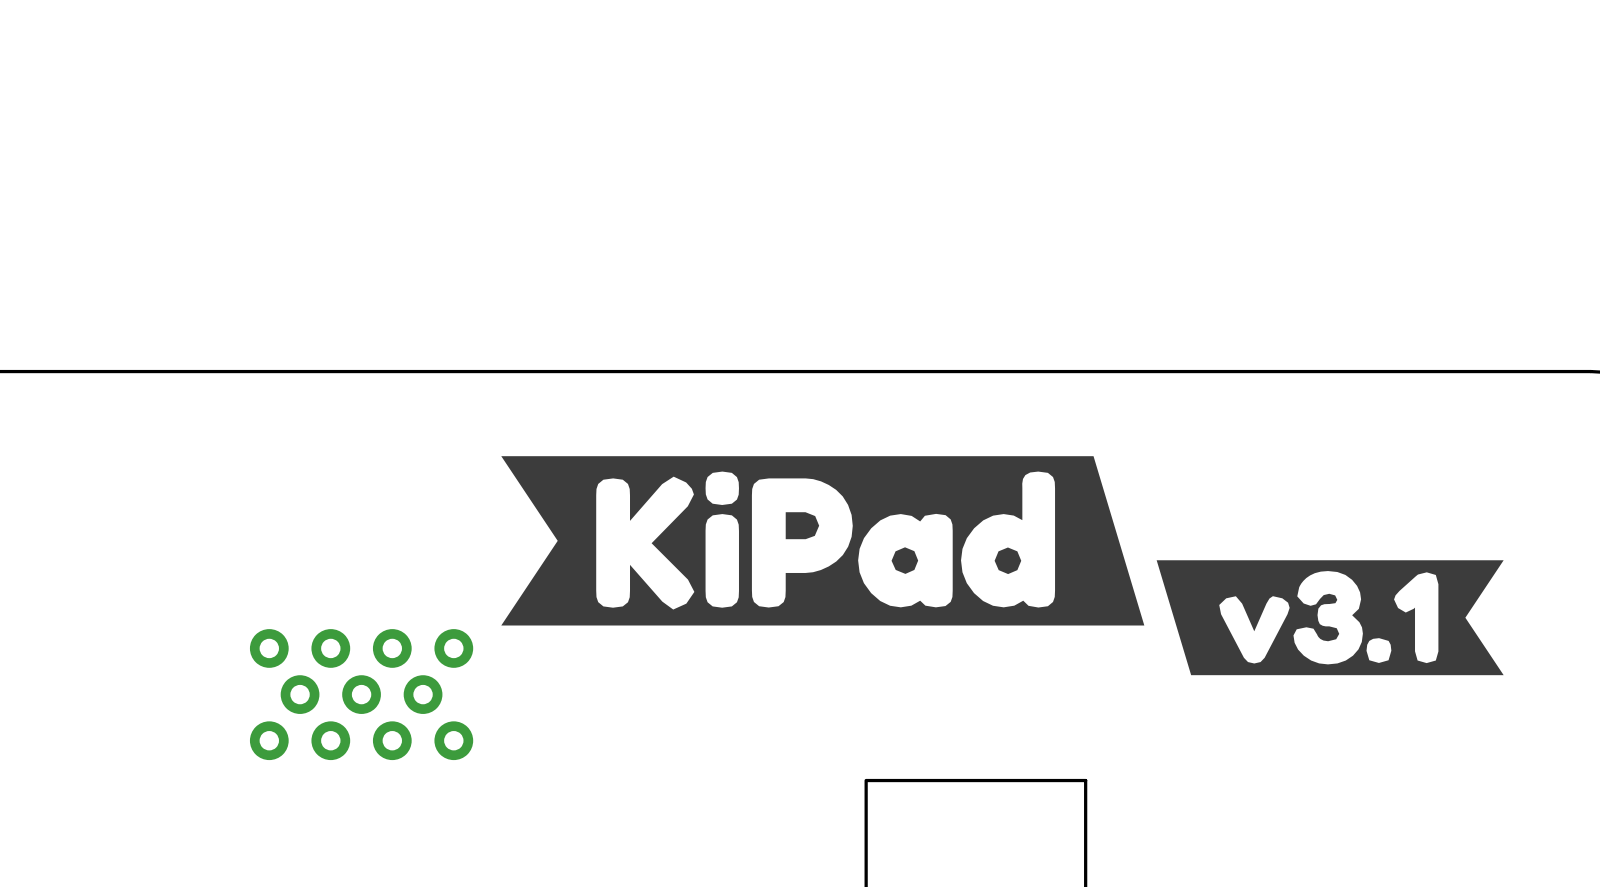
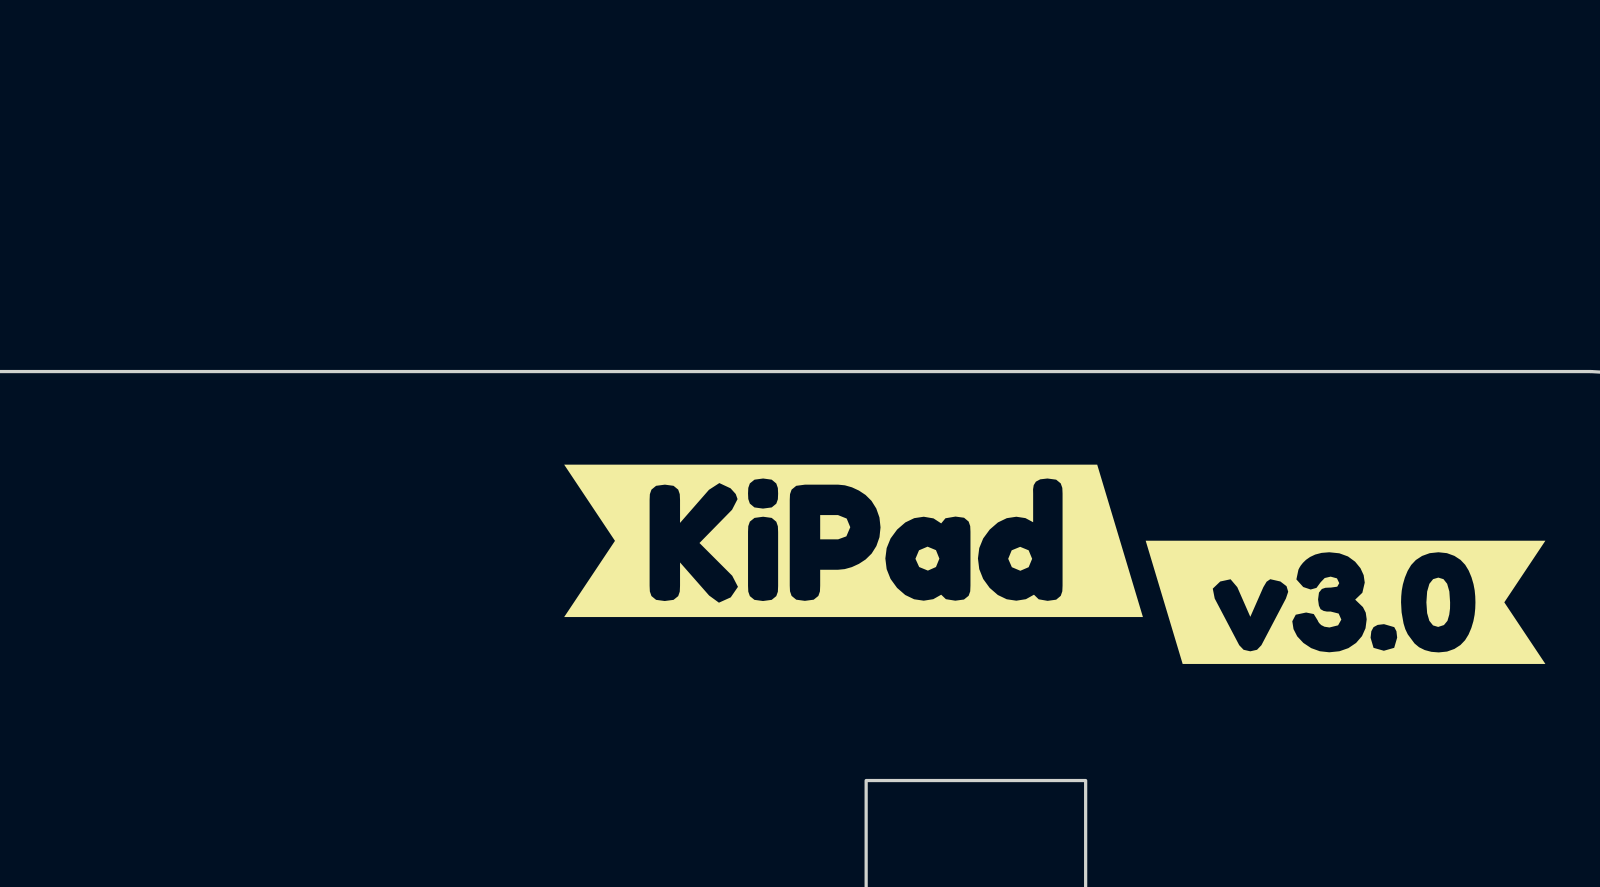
drawing shape: [501, 456, 1145, 626] -> [564, 464, 1143, 618]
drawing shape: [1156, 560, 1504, 676] -> [1145, 540, 1546, 664]
via: (269, 648) -> none
via: (330, 648) -> none
via: (392, 648) -> none
via: (453, 648) -> none
via: (300, 694) -> none
via: (361, 694) -> none
via: (423, 694) -> none
via: (269, 740) -> none
via: (330, 740) -> none
via: (392, 740) -> none
via: (453, 740) -> none

